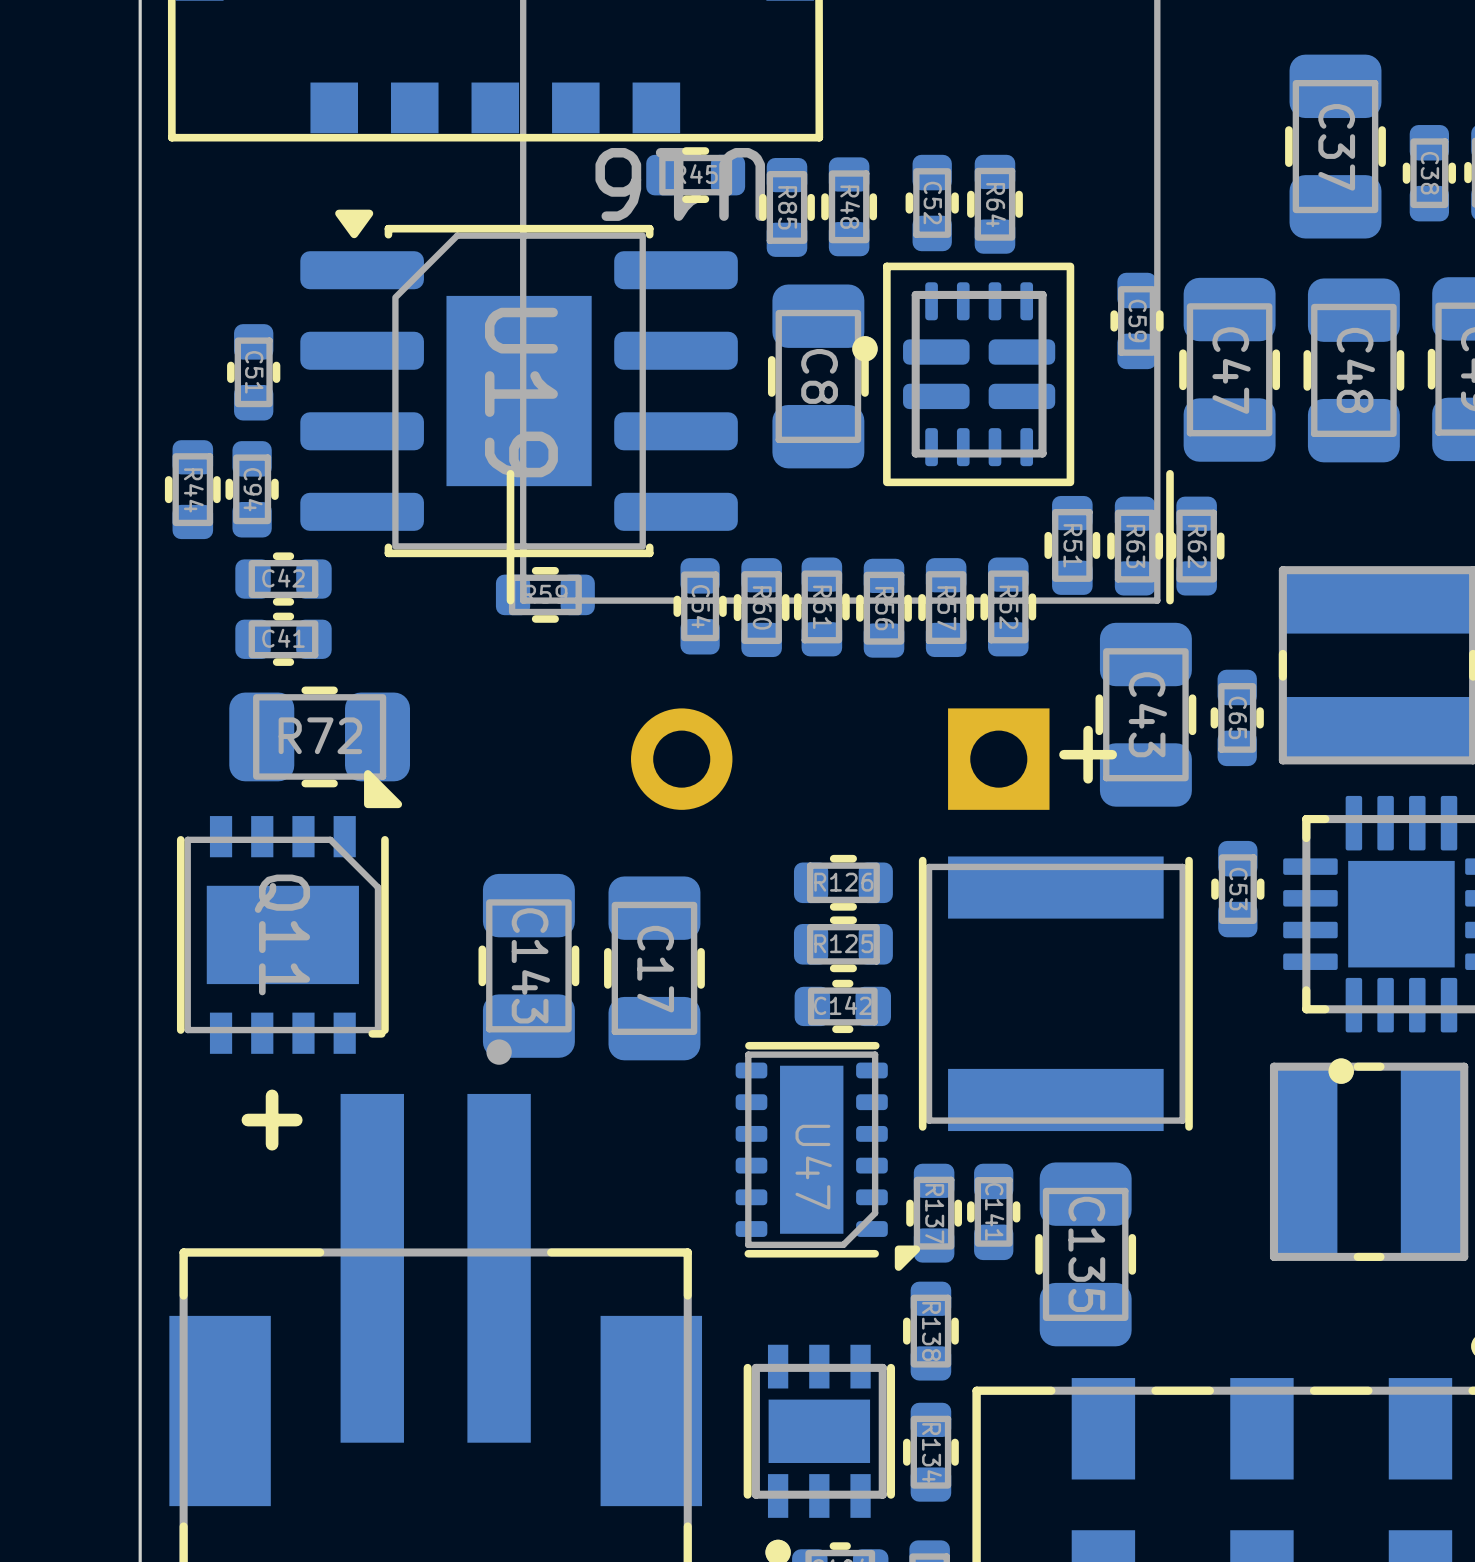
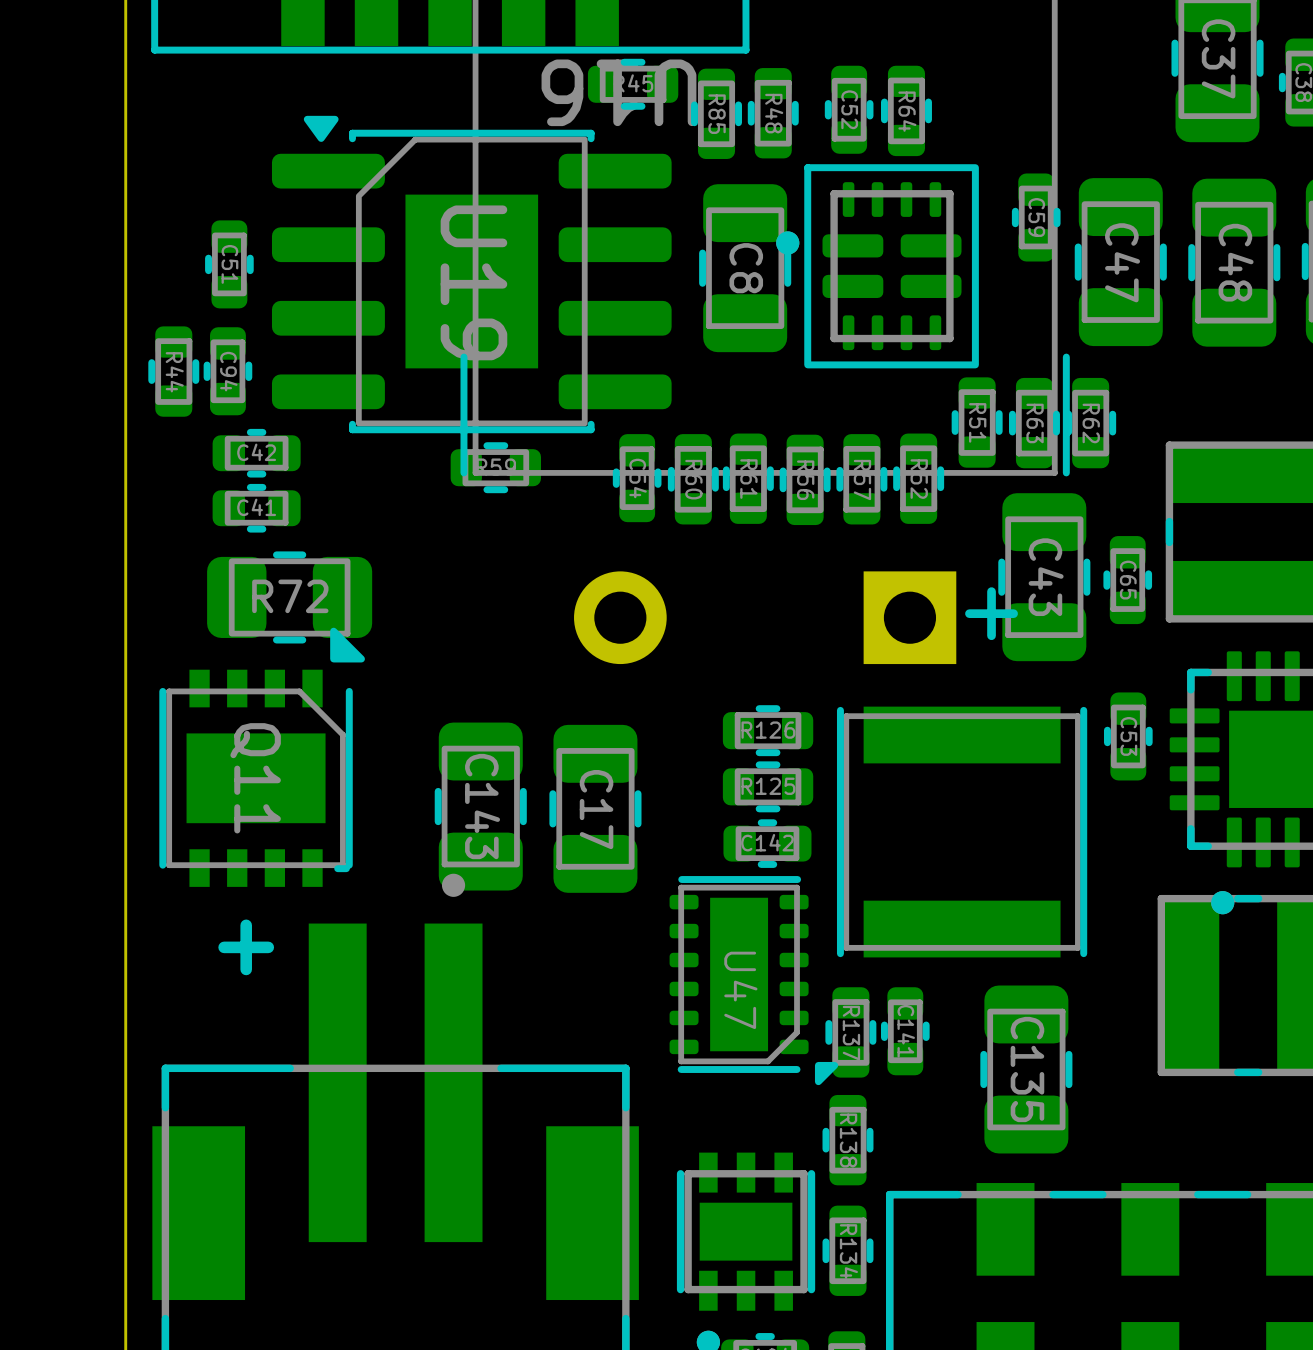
C135 position: (1085, 1254) -> (1026, 1069)

